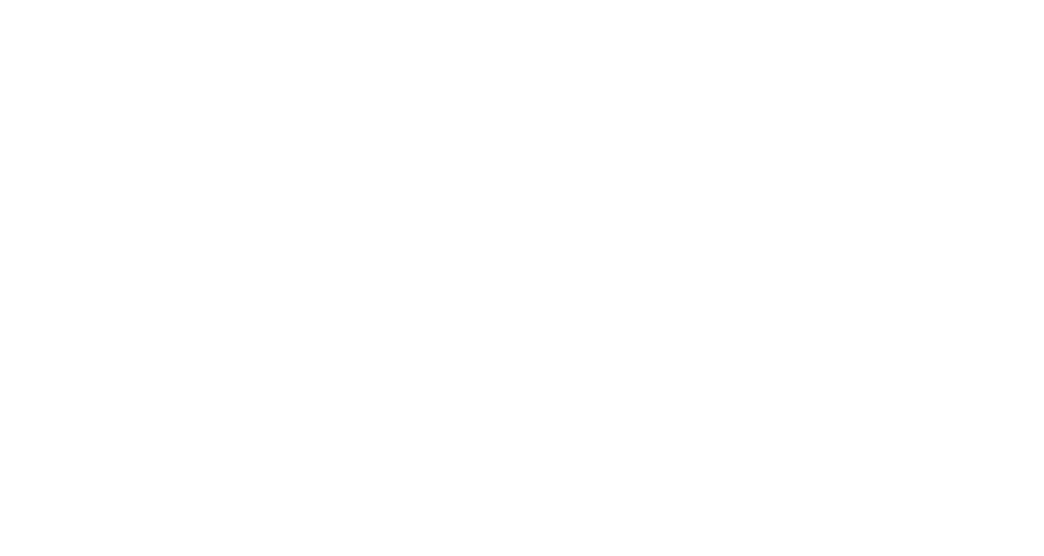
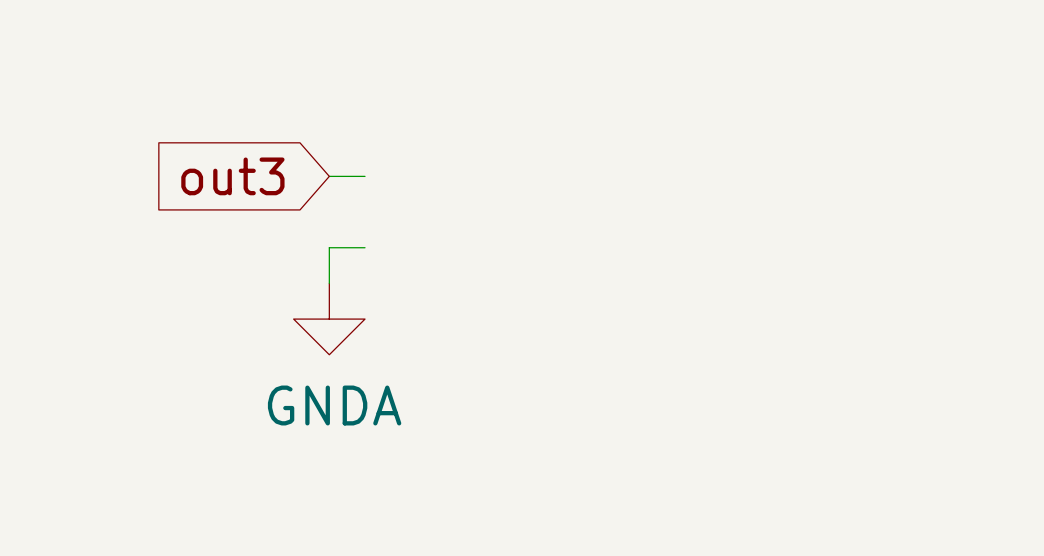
global label: none -> out3 (232, 176)
wire: none -> (329, 176) (365, 176)
wire: none -> (365, 247) (329, 247) (329, 283)
power symbol: none -> GNDA (329, 319)

